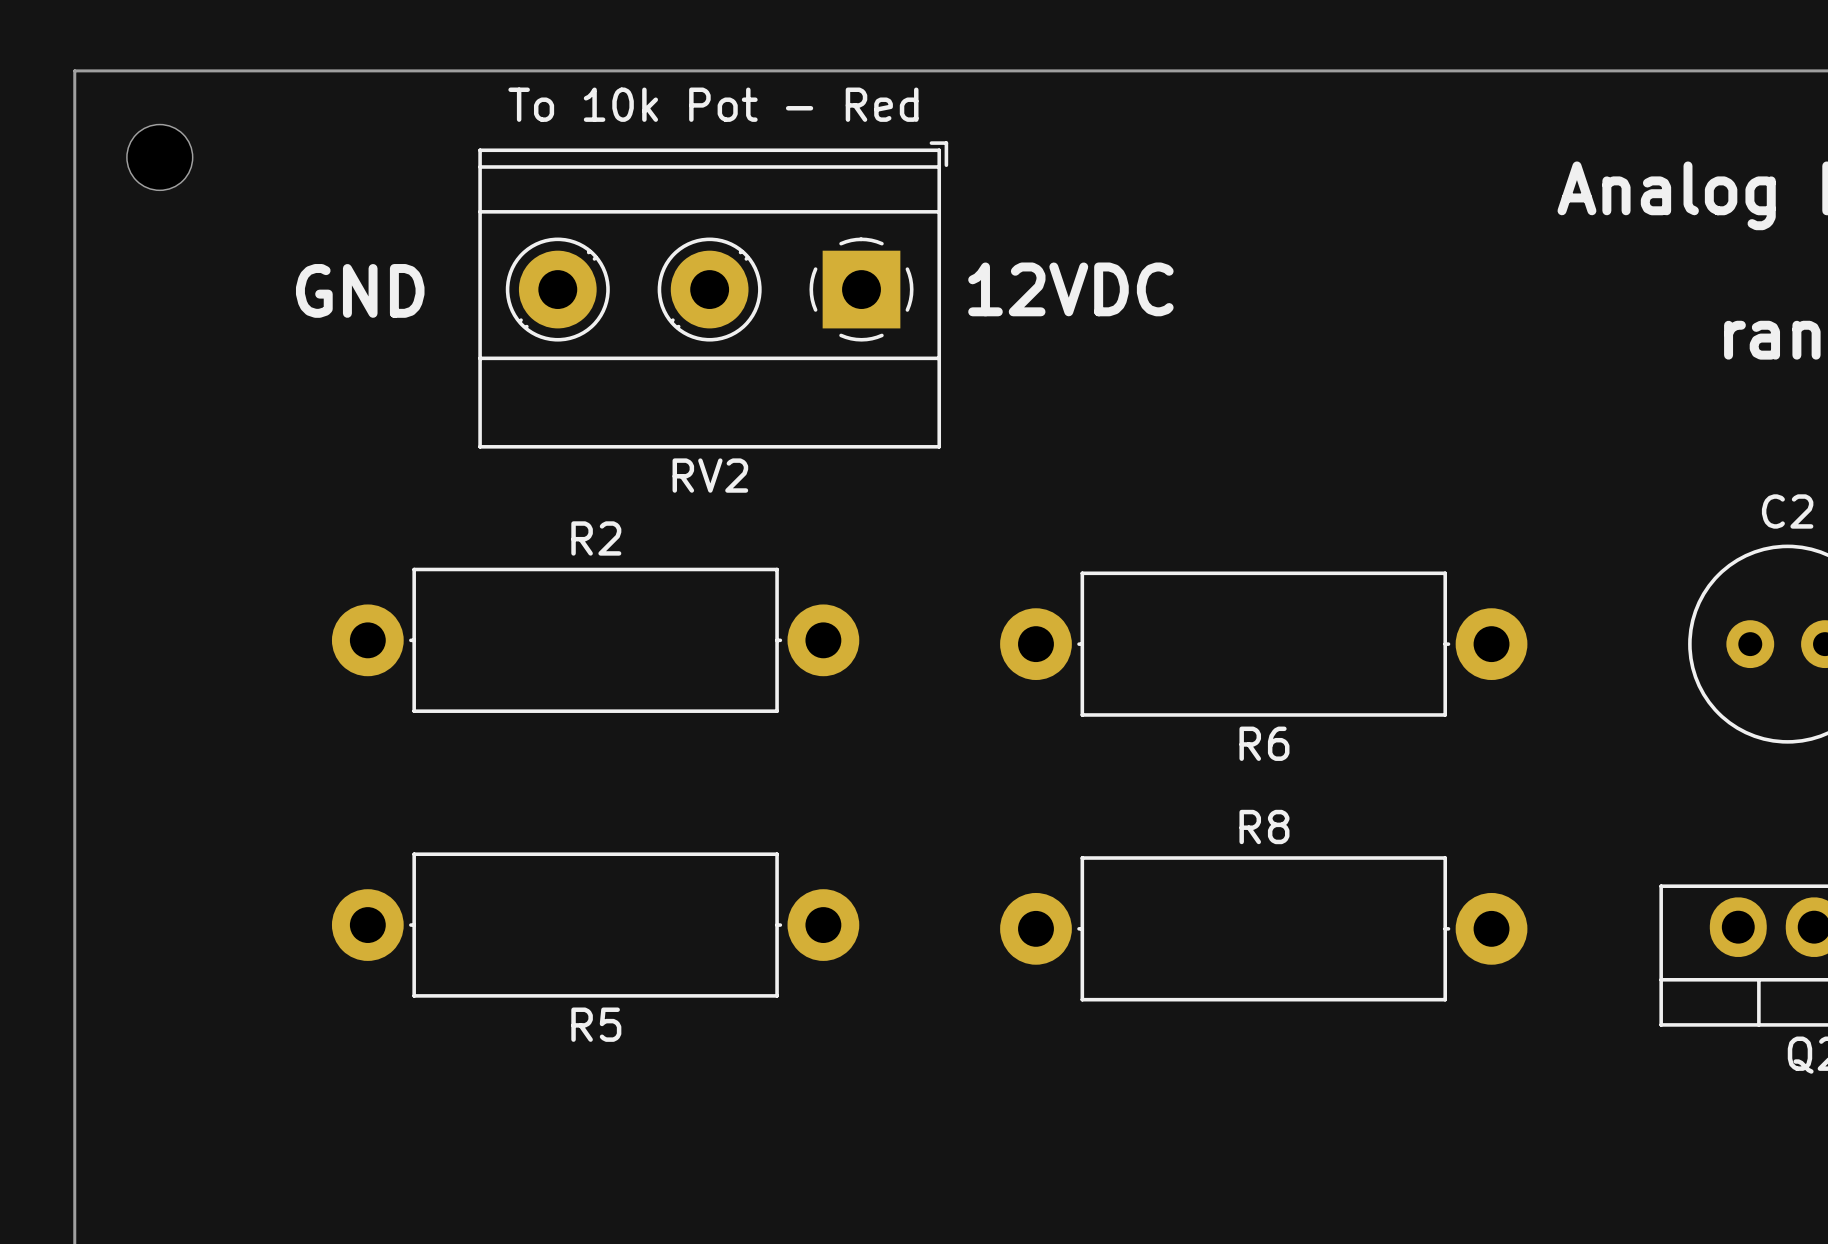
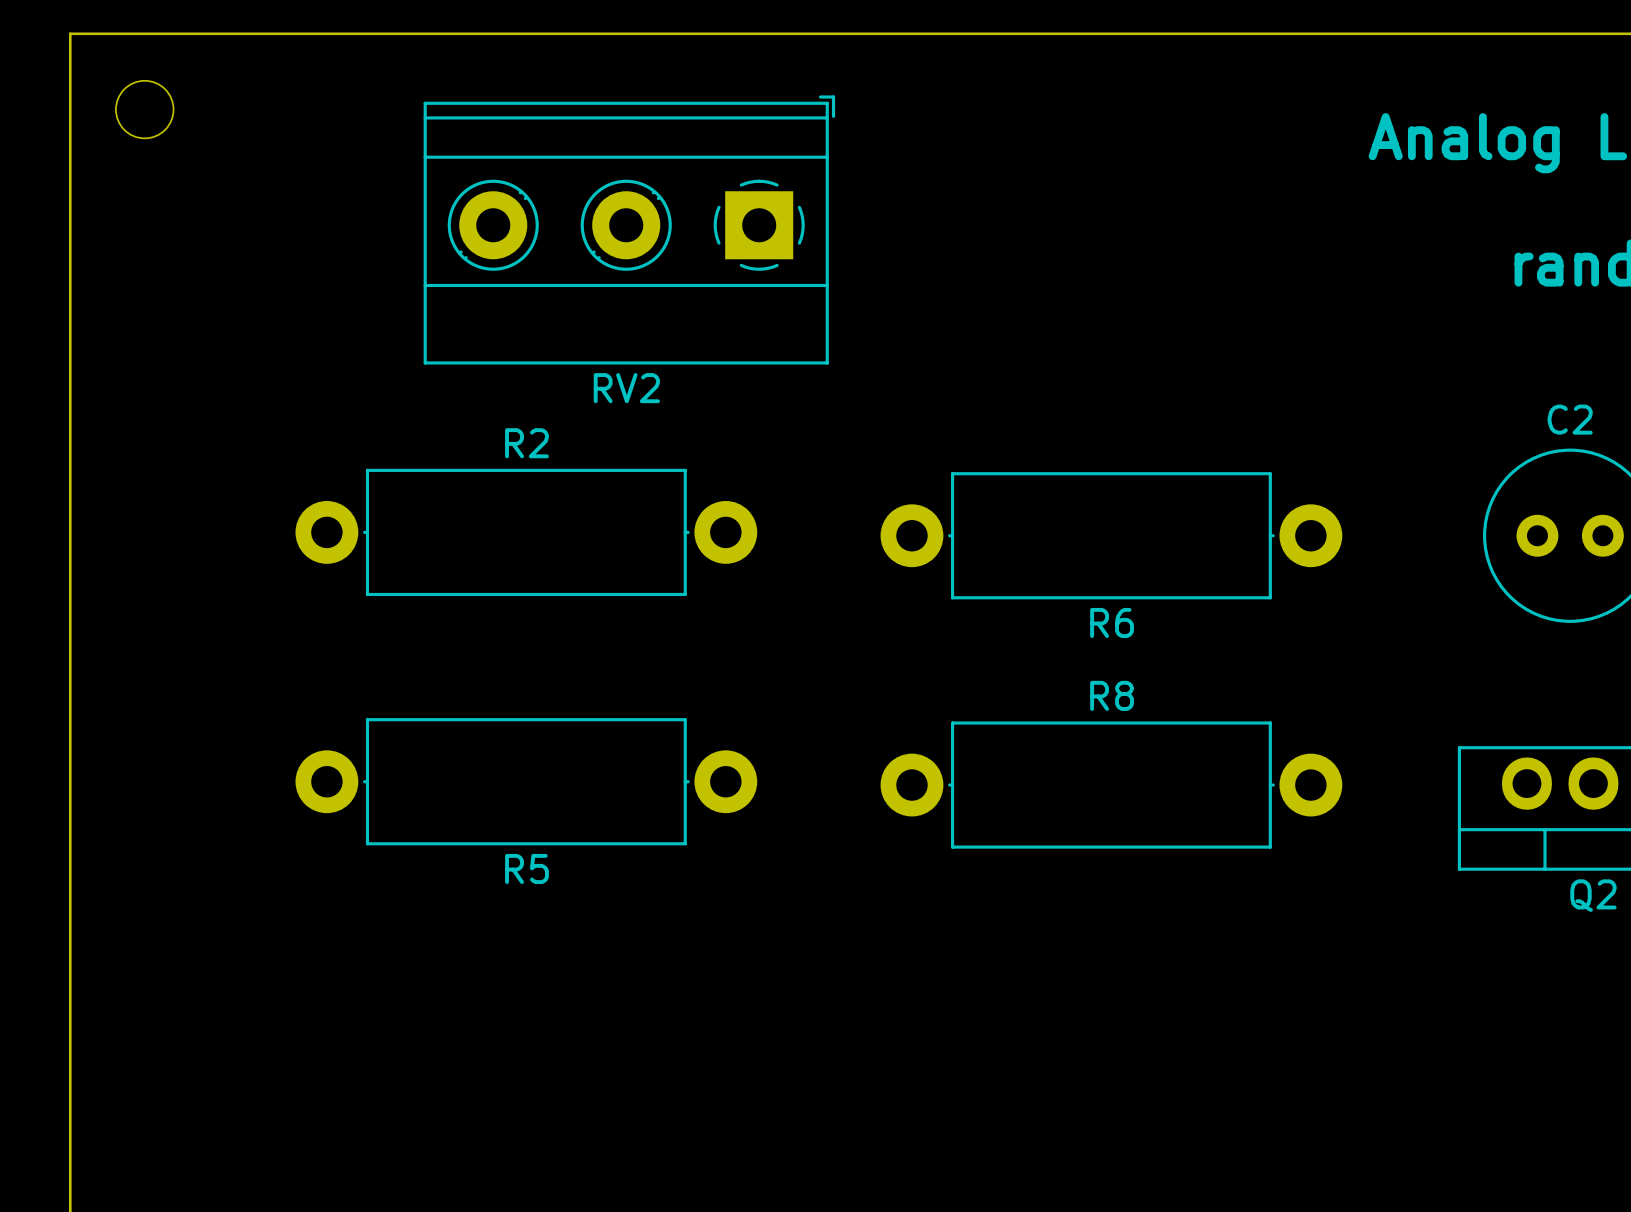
RV2 value: To 10k Pot - Red (713, 104) -> none
text: 12VDC (1070, 289) -> none
text: GND (360, 290) -> none

